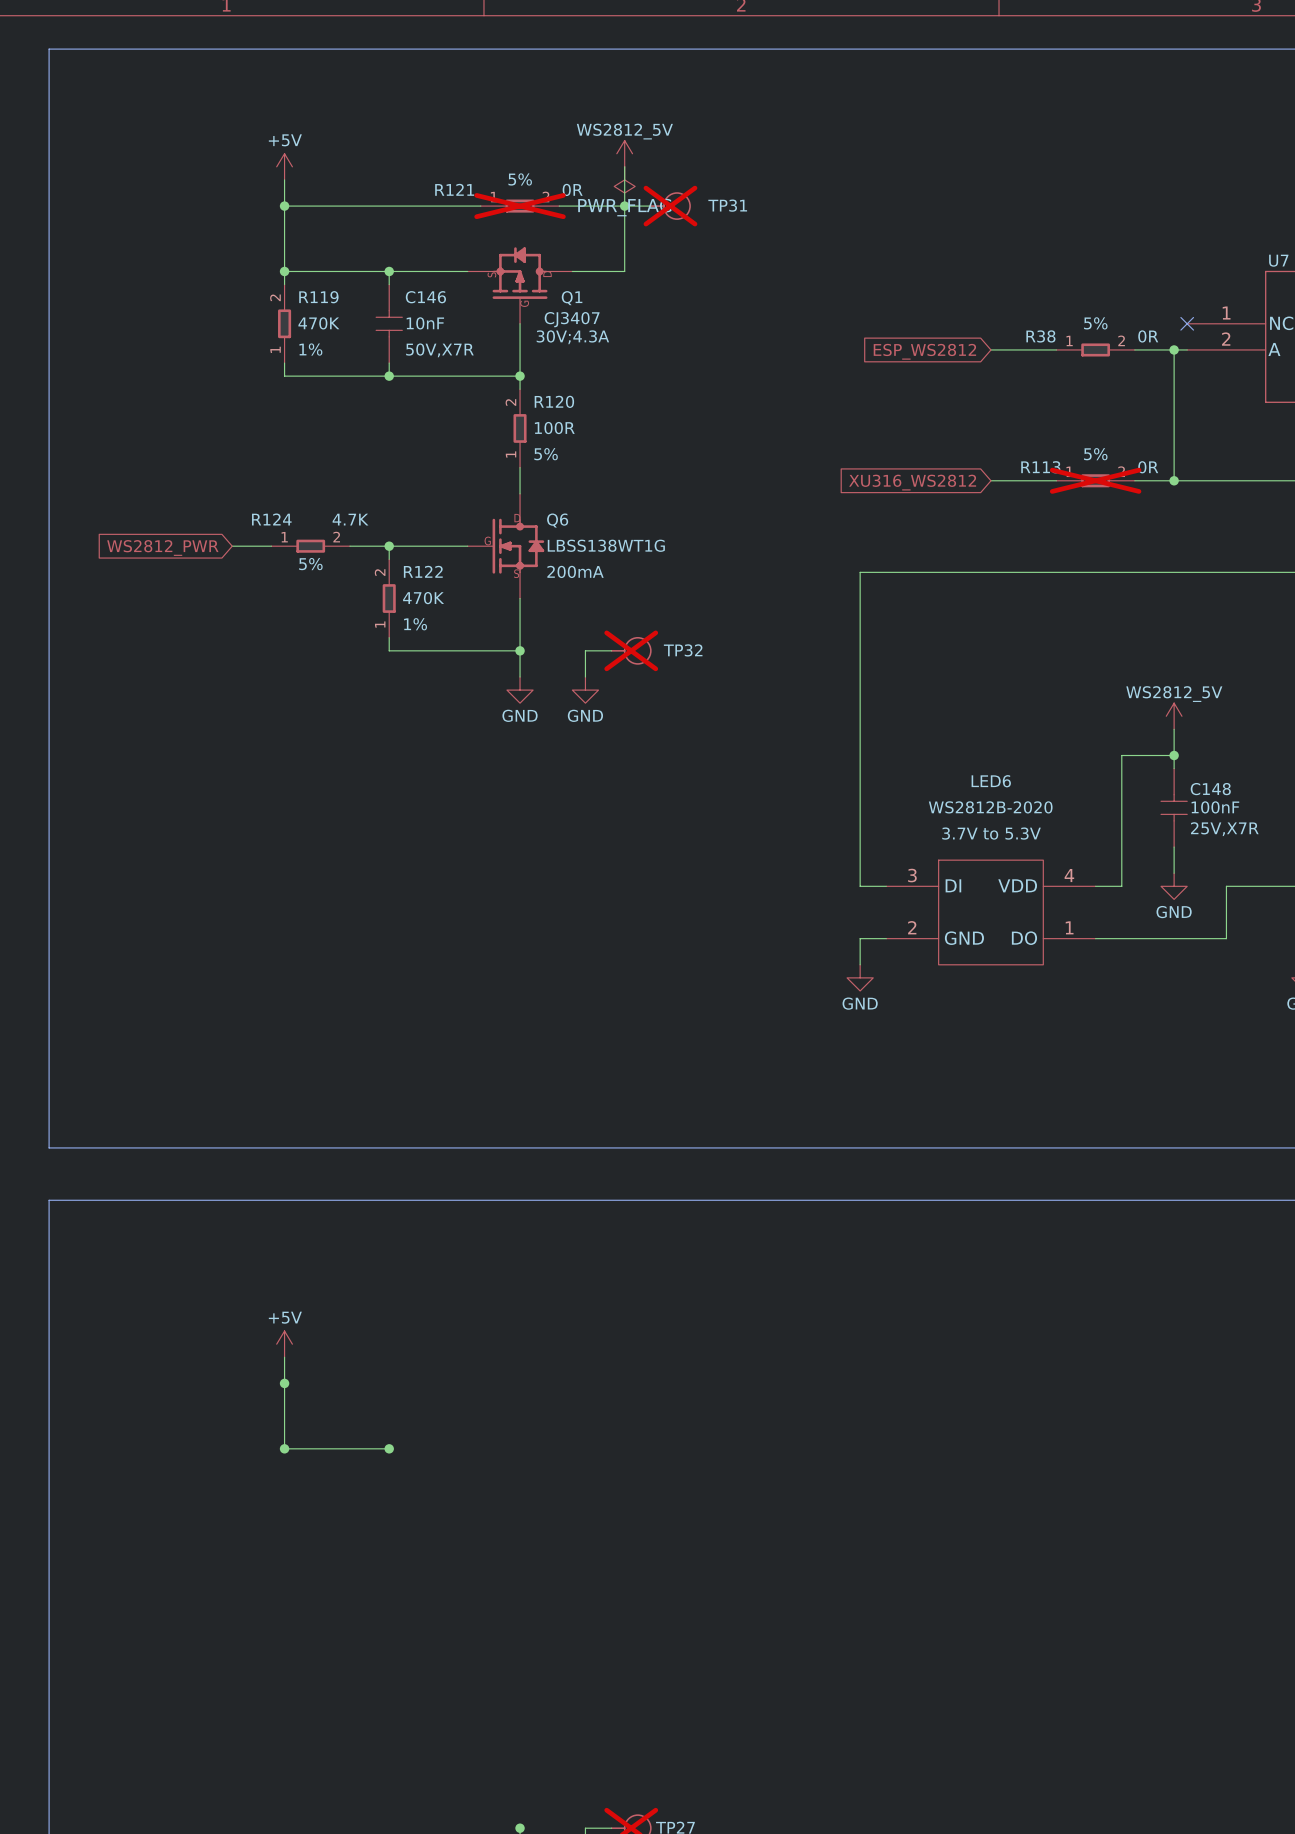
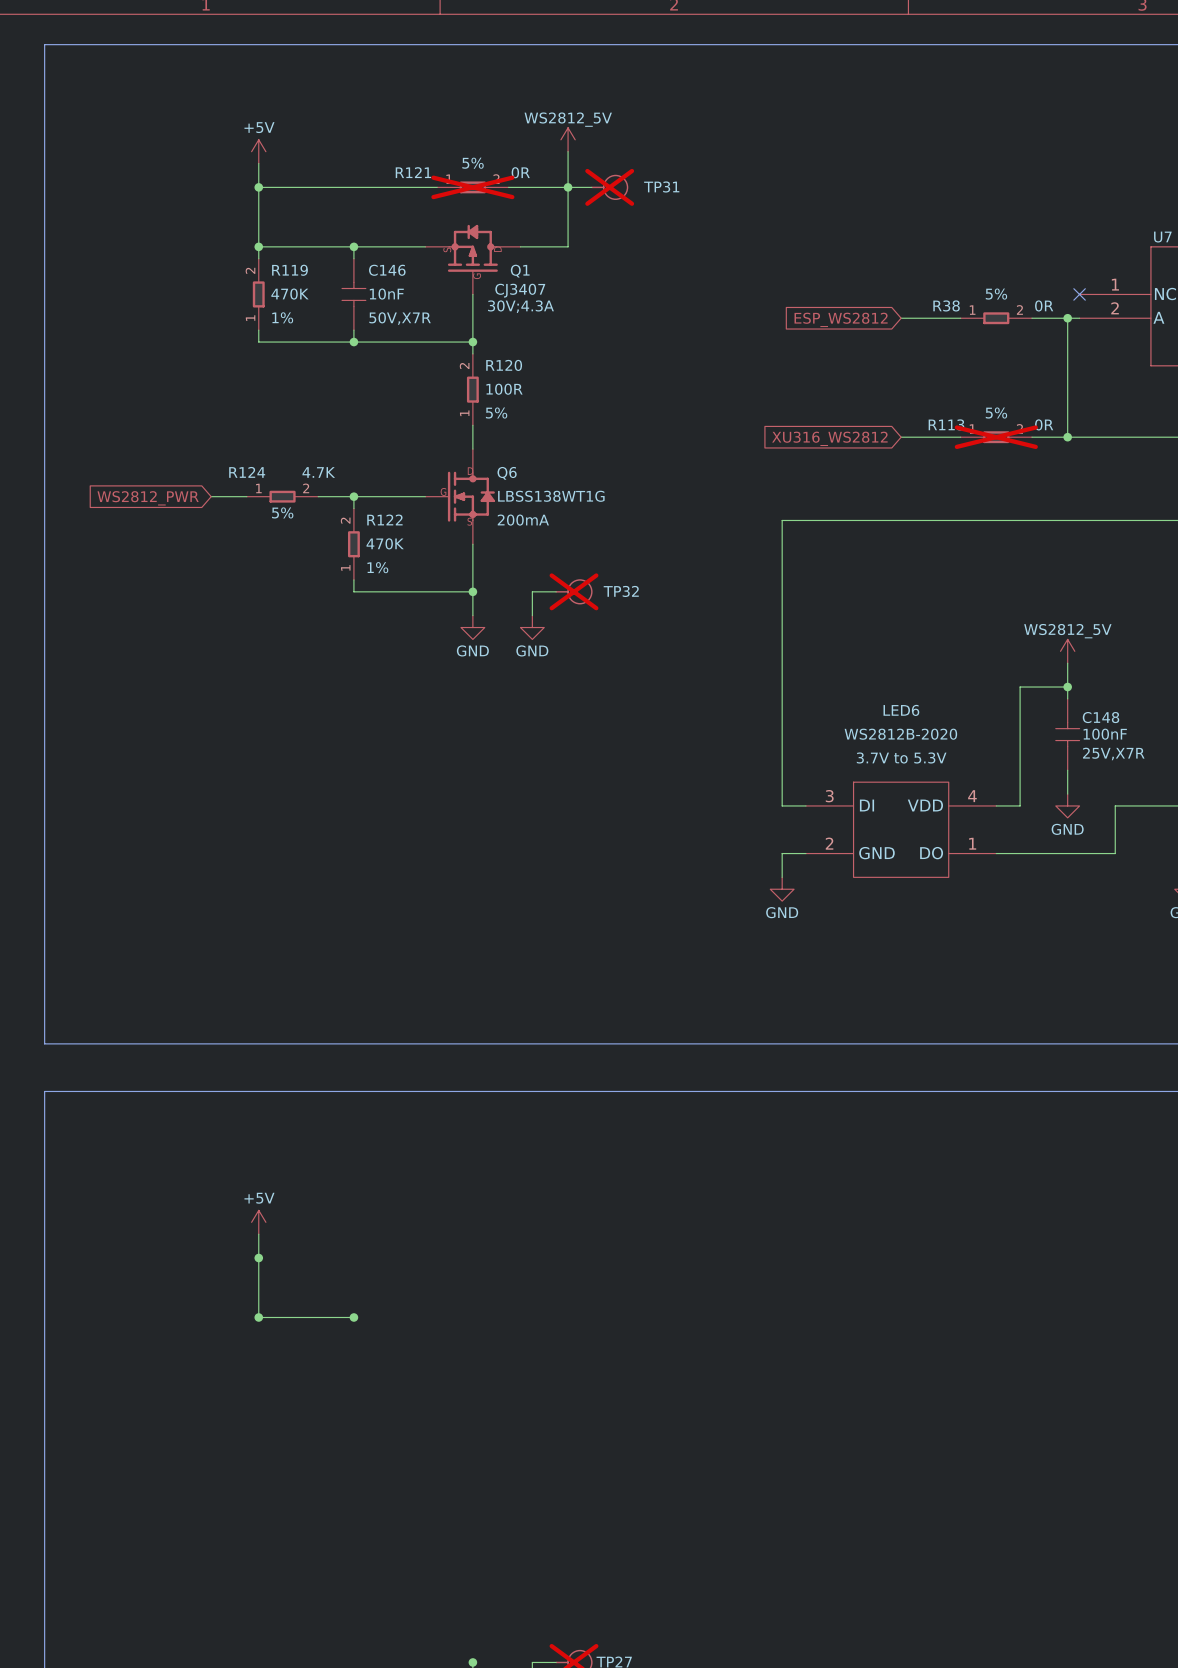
power symbol: PWR_FLAG (624, 179) -> none

